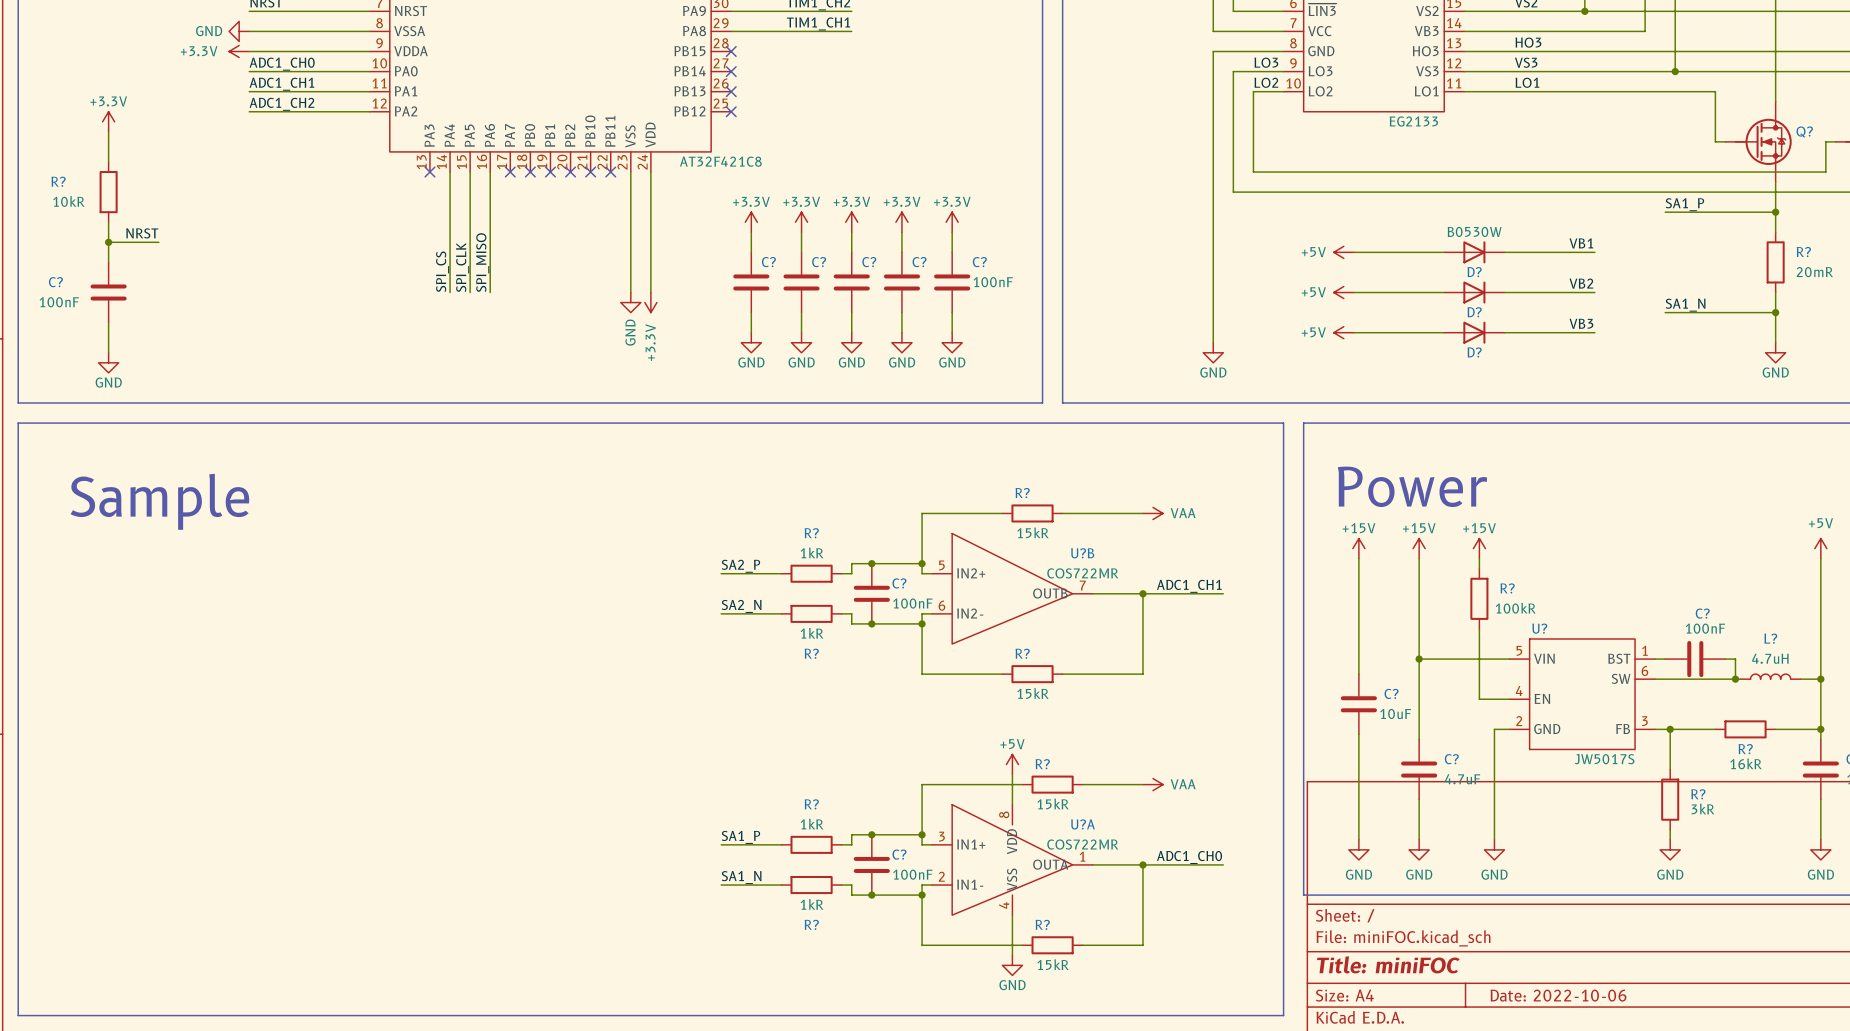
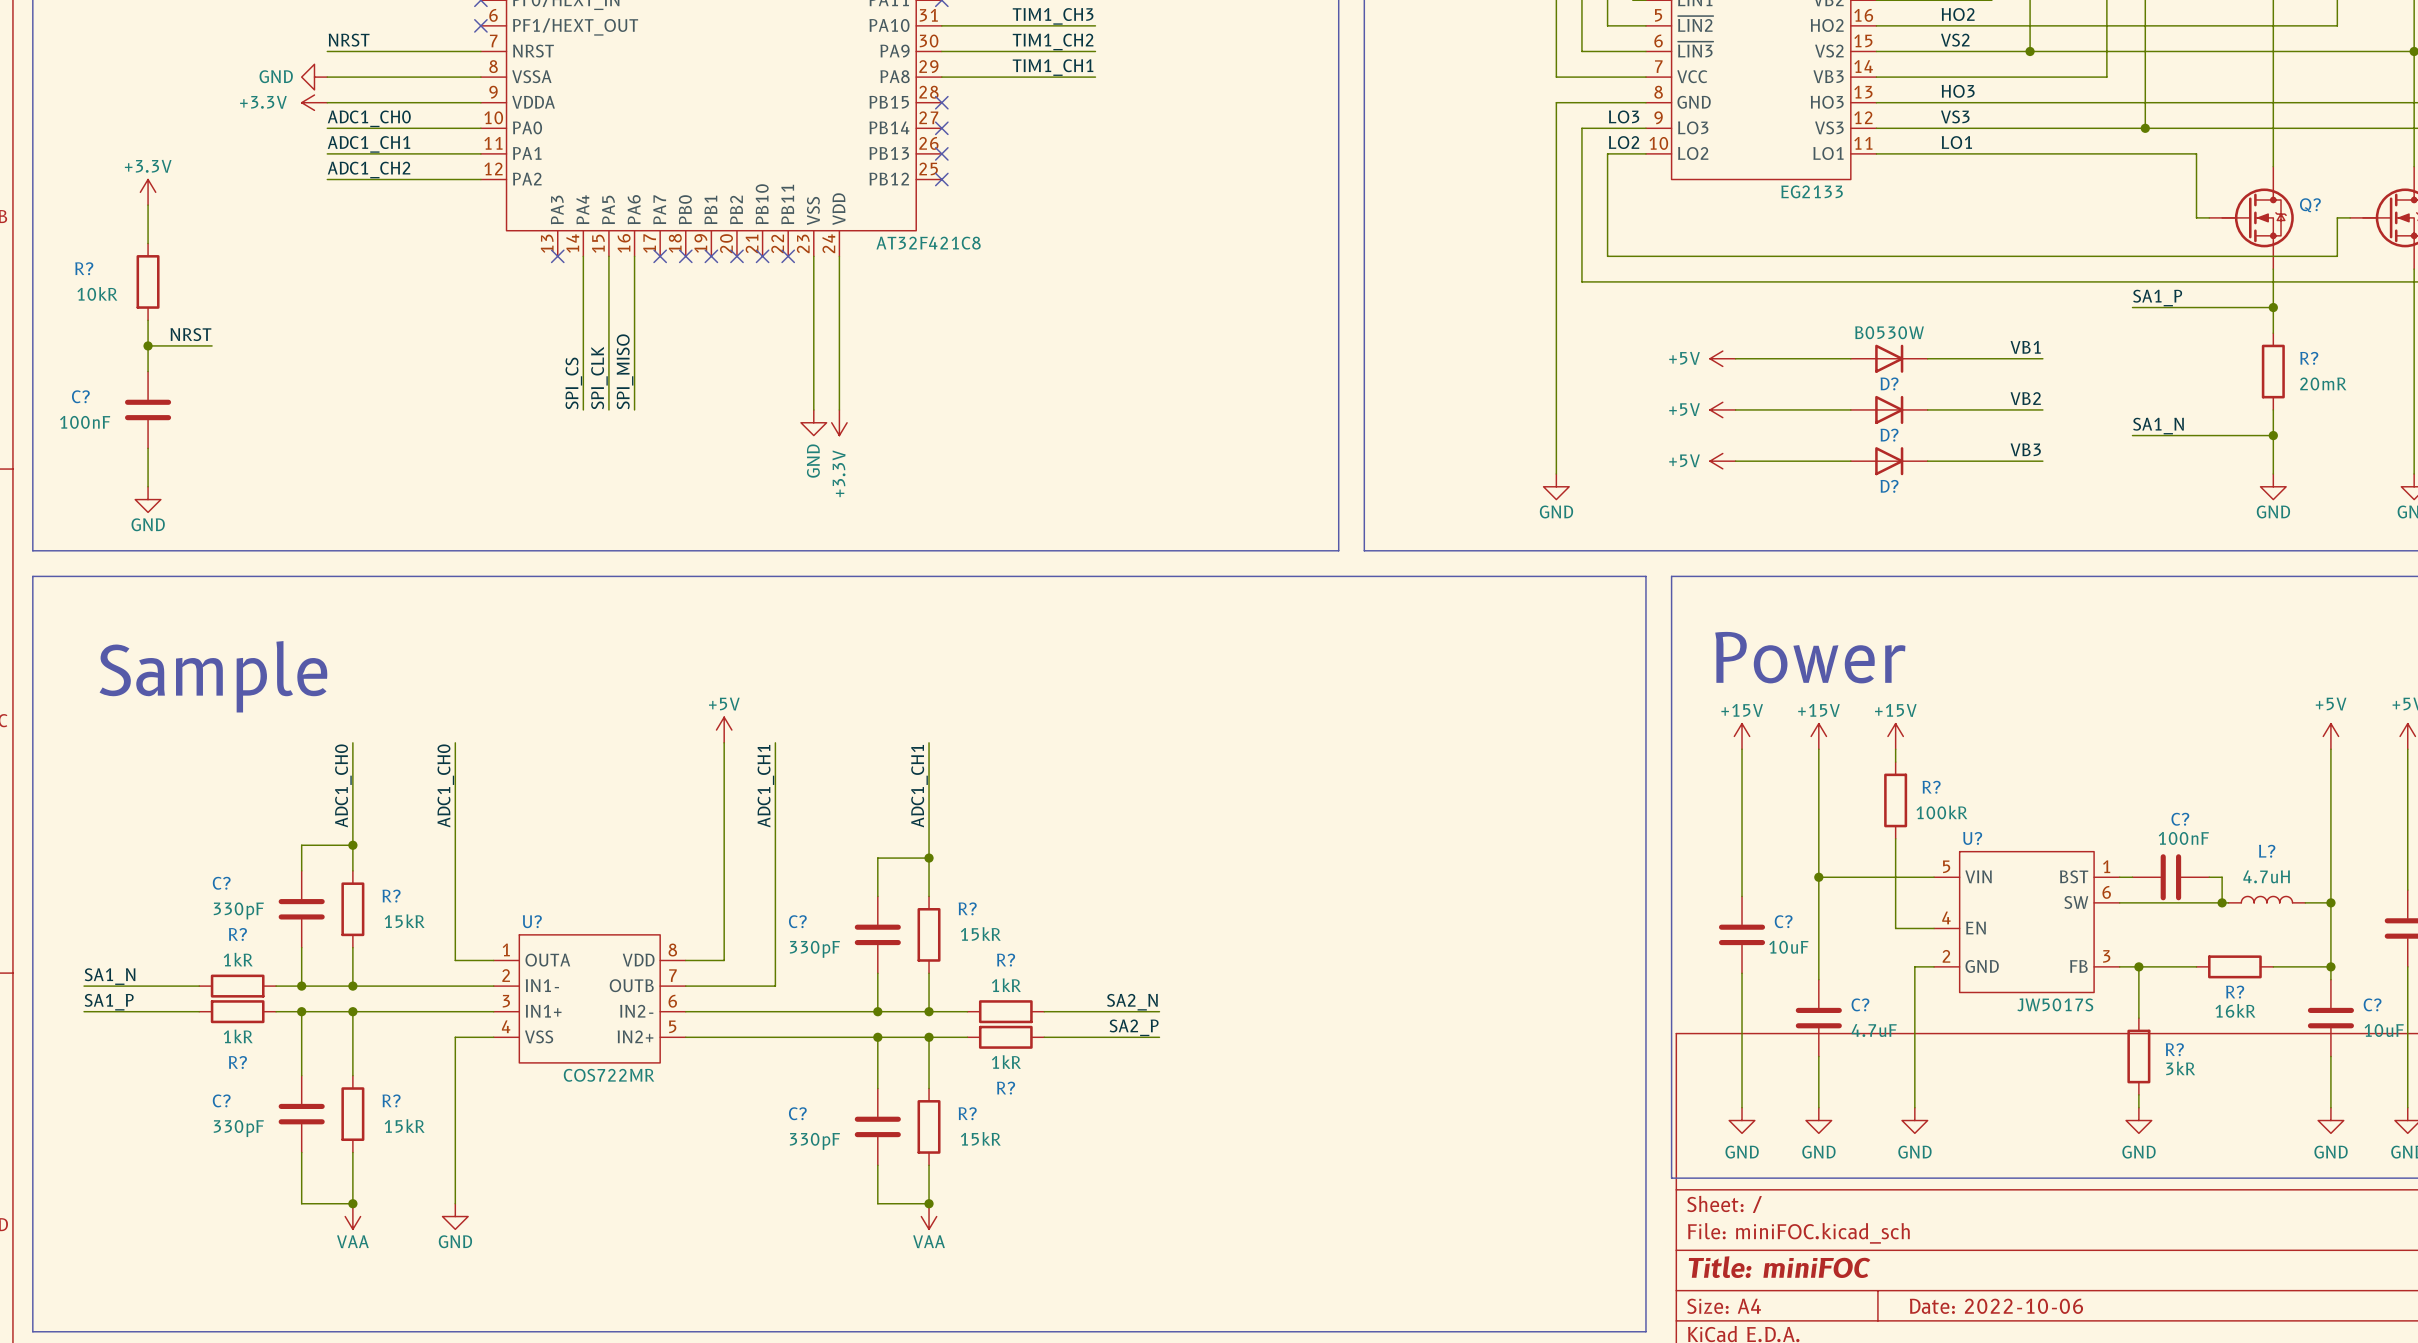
power symbol: +3.3V (751, 222) -> none
power symbol: +3.3V (801, 222) -> none
power symbol: +3.3V (851, 222) -> none
power symbol: +3.3V (901, 222) -> none
power symbol: +3.3V (952, 222) -> none
wire: (751, 232) (751, 252) -> none
wire: (801, 232) (801, 252) -> none
wire: (851, 232) (851, 252) -> none
wire: (901, 232) (901, 252) -> none
wire: (952, 232) (952, 252) -> none
C?: (751, 282) -> none
C?: (801, 282) -> none
C?: (851, 282) -> none
C?: (901, 282) -> none
C?: 100nF (952, 282) -> none
wire: (751, 312) (751, 332) -> none
wire: (801, 312) (801, 332) -> none
wire: (851, 312) (851, 332) -> none
wire: (901, 312) (901, 332) -> none
wire: (952, 312) (952, 332) -> none
power symbol: GND (751, 342) -> none
power symbol: GND (801, 342) -> none
power symbol: GND (851, 342) -> none
power symbol: GND (901, 342) -> none
power symbol: GND (952, 342) -> none
wire: (1002, 513) (922, 513) (922, 573) (932, 573) -> none
R?: 15kR (1032, 513) -> none
wire: (1062, 513) (1142, 513) -> none
power symbol: VAA (1153, 513) -> none
power symbol: none -> +5V (724, 730)
wire: none -> (352, 742) (352, 870)
wire: none -> (455, 742) (455, 960) (493, 960)
wire: none -> (724, 742) (724, 960) (685, 960)
wire: none -> (775, 742) (775, 986) (685, 986)
wire: none -> (929, 742) (929, 896)
junction: (871, 563) -> none
wire: (922, 563) (851, 563) (851, 573) (841, 573) -> none
junction: (922, 563) -> none
label: SA2_P (740, 566) -> none
wire: (721, 573) (781, 573) -> none
R?: 1kR (811, 573) -> none
label: ADC1_CH1 (1189, 586) -> none
label: none -> ADC1_CH0 (343, 785)
label: none -> ADC1_CH0 (445, 785)
label: none -> ADC1_CH1 (765, 786)
label: none -> ADC1_CH1 (919, 786)
U?B: COS722MR (1012, 588) -> none
C?: 100nF (871, 593) -> none
wire: (1092, 593) (1223, 593) -> none
wire: (1142, 593) (1142, 674) (1062, 674) -> none
junction: (1142, 593) -> none
label: SA2_N (741, 606) -> none
wire: (721, 613) (781, 613) -> none
R?: 1kR (811, 613) -> none
wire: (841, 613) (851, 613) (851, 623) (922, 623) -> none
wire: (932, 613) (922, 613) (922, 674) (1002, 674) -> none
junction: (871, 623) -> none
junction: (922, 623) -> none
wire: none -> (352, 845) (301, 845) (301, 870)
junction: none -> (352, 845)
wire: none -> (929, 858) (877, 858) (877, 896)
junction: none -> (929, 858)
R?: 15kR (1032, 674) -> none
C?: none -> 330pF (301, 909)
R?: none -> 15kR (352, 909)
C?: none -> 330pF (877, 934)
R?: none -> 15kR (929, 934)
wire: none -> (301, 947) (301, 986)
wire: none -> (352, 947) (352, 986)
wire: none -> (877, 973) (877, 1011)
wire: none -> (929, 973) (929, 1011)
label: none -> SA1_N (110, 976)
wire: none -> (84, 986) (199, 986)
R?: none -> 1kR (237, 986)
wire: none -> (276, 986) (493, 986)
junction: none -> (301, 986)
junction: none -> (352, 986)
U?: none -> COS722MR (589, 998)
label: none -> SA1_P (109, 1002)
label: none -> SA2_N (1132, 1002)
wire: none -> (84, 1011) (199, 1011)
R?: none -> 1kR (237, 1011)
wire: none -> (276, 1011) (493, 1011)
wire: none -> (301, 1011) (301, 1075)
junction: none -> (301, 1011)
wire: none -> (352, 1011) (352, 1075)
junction: none -> (352, 1011)
wire: none -> (685, 1011) (967, 1011)
junction: none -> (877, 1011)
junction: none -> (929, 1011)
R?: none -> 1kR (1005, 1011)
wire: none -> (1044, 1011) (1159, 1011)
power symbol: +5V (1012, 764) -> none
wire: (1012, 774) (1012, 804) -> none
label: none -> SA2_P (1134, 1027)
wire: none -> (493, 1037) (455, 1037) (455, 1203)
wire: none -> (685, 1037) (967, 1037)
wire: none -> (877, 1037) (877, 1088)
junction: none -> (877, 1037)
wire: none -> (929, 1037) (929, 1088)
junction: none -> (929, 1037)
R?: none -> 1kR (1005, 1037)
wire: none -> (1044, 1037) (1159, 1037)
wire: (1022, 784) (922, 784) (922, 844) (932, 844) -> none
R?: 15kR (1052, 784) -> none
wire: (1082, 784) (1142, 784) -> none
power symbol: VAA (1153, 784) -> none
junction: (871, 834) -> none
wire: (922, 834) (851, 834) (851, 844) (841, 844) -> none
junction: (922, 834) -> none
label: SA1_P (740, 837) -> none
C?: none -> 330pF (301, 1114)
R?: none -> 15kR (352, 1114)
wire: (721, 844) (781, 844) -> none
R?: 1kR (811, 844) -> none
C?: none -> 330pF (877, 1126)
R?: none -> 15kR (929, 1126)
label: ADC1_CH0 (1189, 857) -> none
U?A: COS722MR (1012, 859) -> none
C?: 100nF (871, 864) -> none
wire: (1092, 864) (1223, 864) -> none
wire: (1142, 864) (1142, 945) (1082, 945) -> none
junction: (1142, 864) -> none
wire: none -> (301, 1152) (301, 1203) (352, 1203) (352, 1152)
label: SA1_N (741, 877) -> none
wire: (721, 885) (781, 885) -> (929, 1165) (929, 1203) (877, 1203) (877, 1165)
R?: 1kR (811, 885) -> none
wire: (841, 885) (851, 885) (851, 895) (922, 895) -> none
wire: (932, 885) (922, 885) (922, 945) (1022, 945) -> none
junction: (871, 895) -> none
junction: (922, 895) -> none
junction: none -> (352, 1203)
junction: none -> (929, 1203)
wire: (1012, 915) (1012, 955) -> none
power symbol: none -> VAA (352, 1216)
power symbol: none -> GND (455, 1216)
power symbol: none -> VAA (929, 1216)
R?: 15kR (1052, 945) -> none
power symbol: GND (1012, 965) -> none

